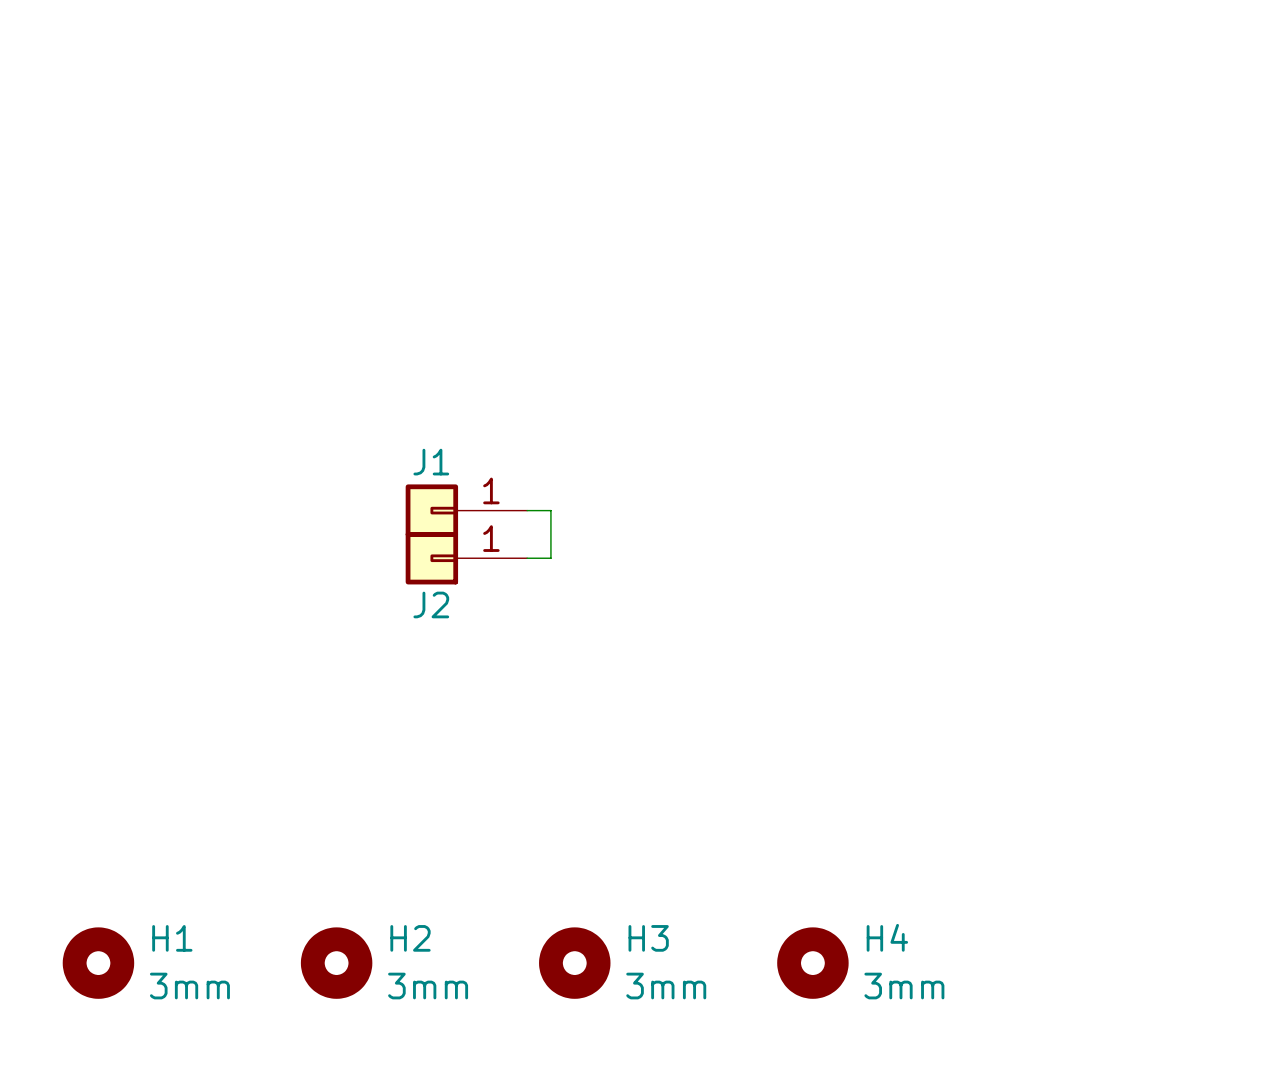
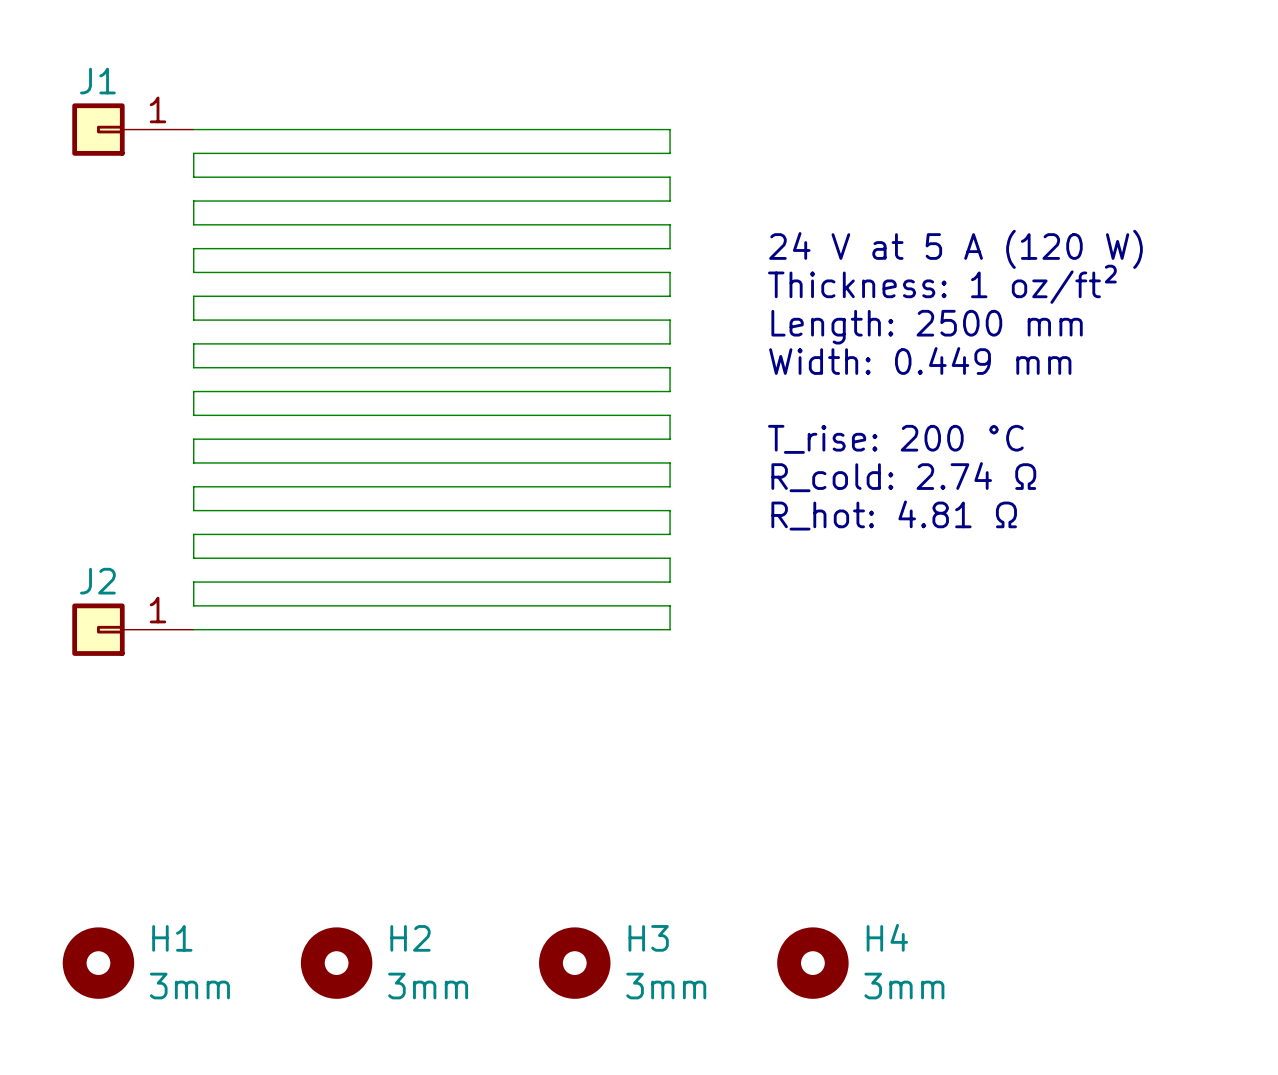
wire: none -> (193, 129) (670, 129) (670, 153) (193, 153) (193, 177) (670, 177) (670, 201) (193, 201) (193, 224) (670, 224) (670, 248) (193, 248) (193, 272) (670, 272) (670, 296) (193, 296) (193, 320) (670, 320) (670, 343) (193, 343) (193, 367) (670, 367) (670, 391) (193, 391) (193, 415) (670, 415) (670, 439) (193, 439) (193, 462) (670, 462) (670, 486) (193, 486) (193, 510) (527, 510)
text: none -> 24 V at 5 A (120 W) (955, 249)
text: none -> Thickness: 1 oz/ft² (942, 284)
text: none -> Length: 2500 mm (927, 327)
text: none -> Width: 0.449 mm (920, 360)
text: none -> T_rise: 200 °C (895, 439)
text: none -> R_cold: 2.74 Ω (903, 477)
J1 position: (466, 510) -> (132, 129)
wire: (550, 510) (550, 558) -> (550, 510) (670, 510) (670, 534) (193, 534) (193, 558) (527, 558)
text: none -> R_hot: 4.81 Ω (894, 515)
J2 position: (466, 558) -> (132, 629)
wire: none -> (550, 558) (670, 558) (670, 582) (193, 582) (193, 605) (670, 605) (670, 629) (193, 629)
J2 name position: J2 (431, 604) -> J2 (97, 581)

